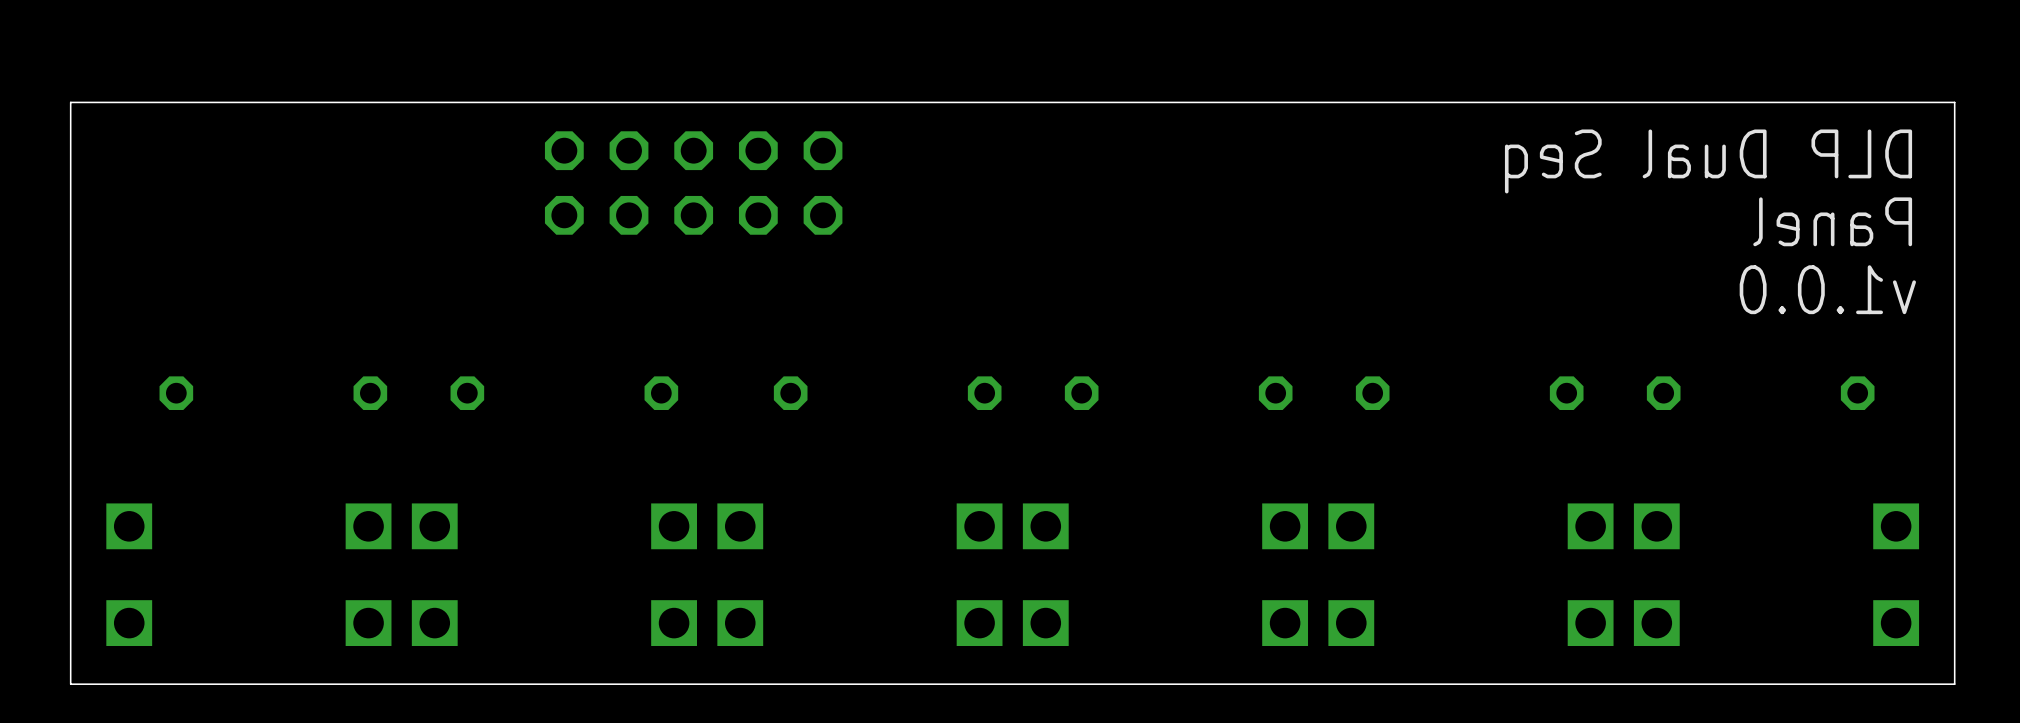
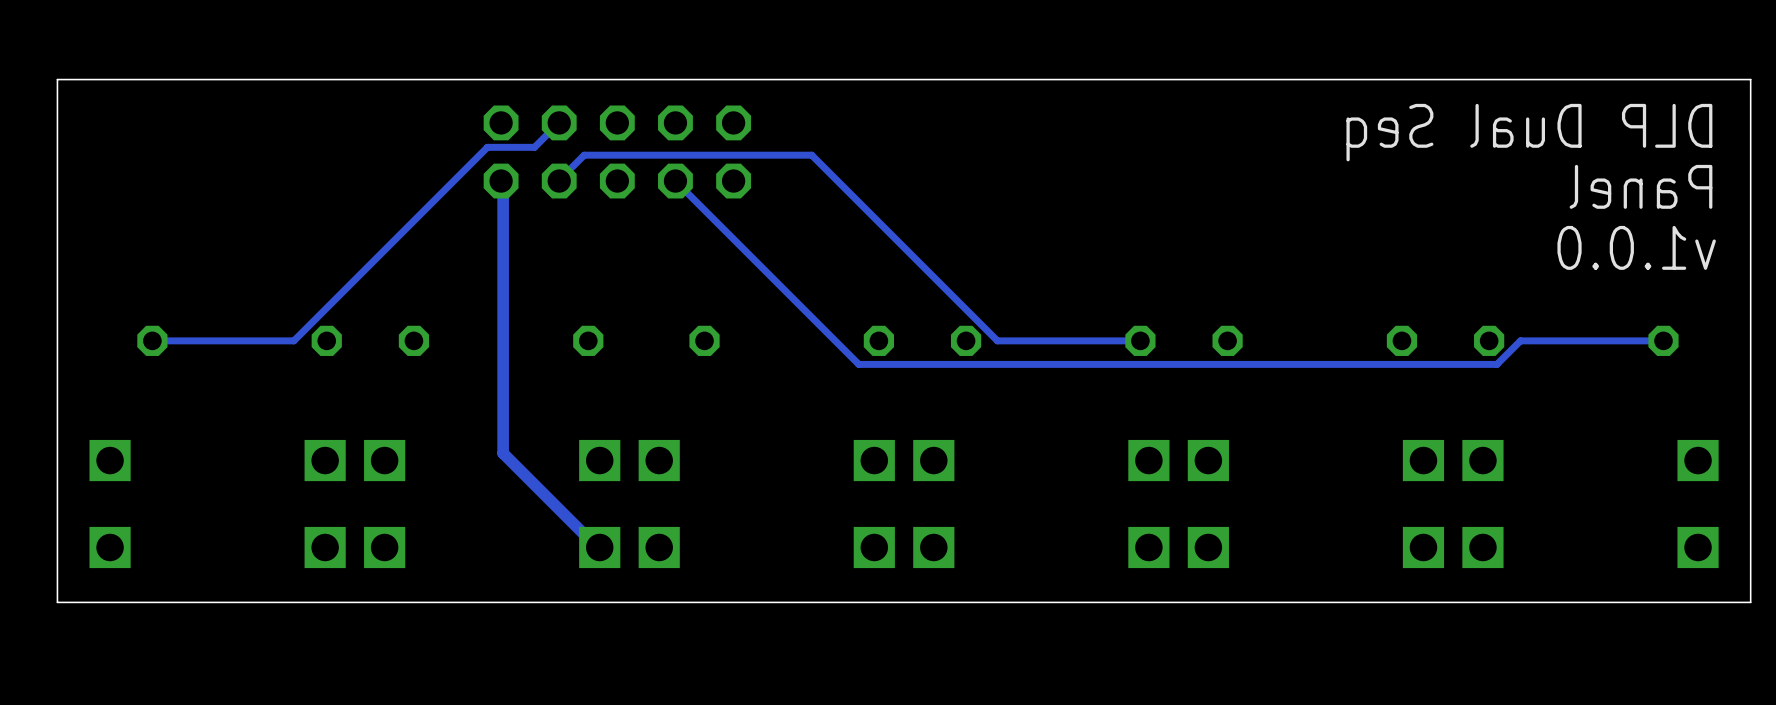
track: none -> (559, 122) (534, 147) (487, 147) (293, 340) (152, 340)
track: none -> (501, 181) (503, 181) (503, 453) (597, 547) (599, 547)
track: none -> (559, 181) (584, 155) (811, 155) (997, 340) (1140, 340)
track: none -> (675, 181) (858, 364) (1496, 364) (1520, 340) (1663, 340)

